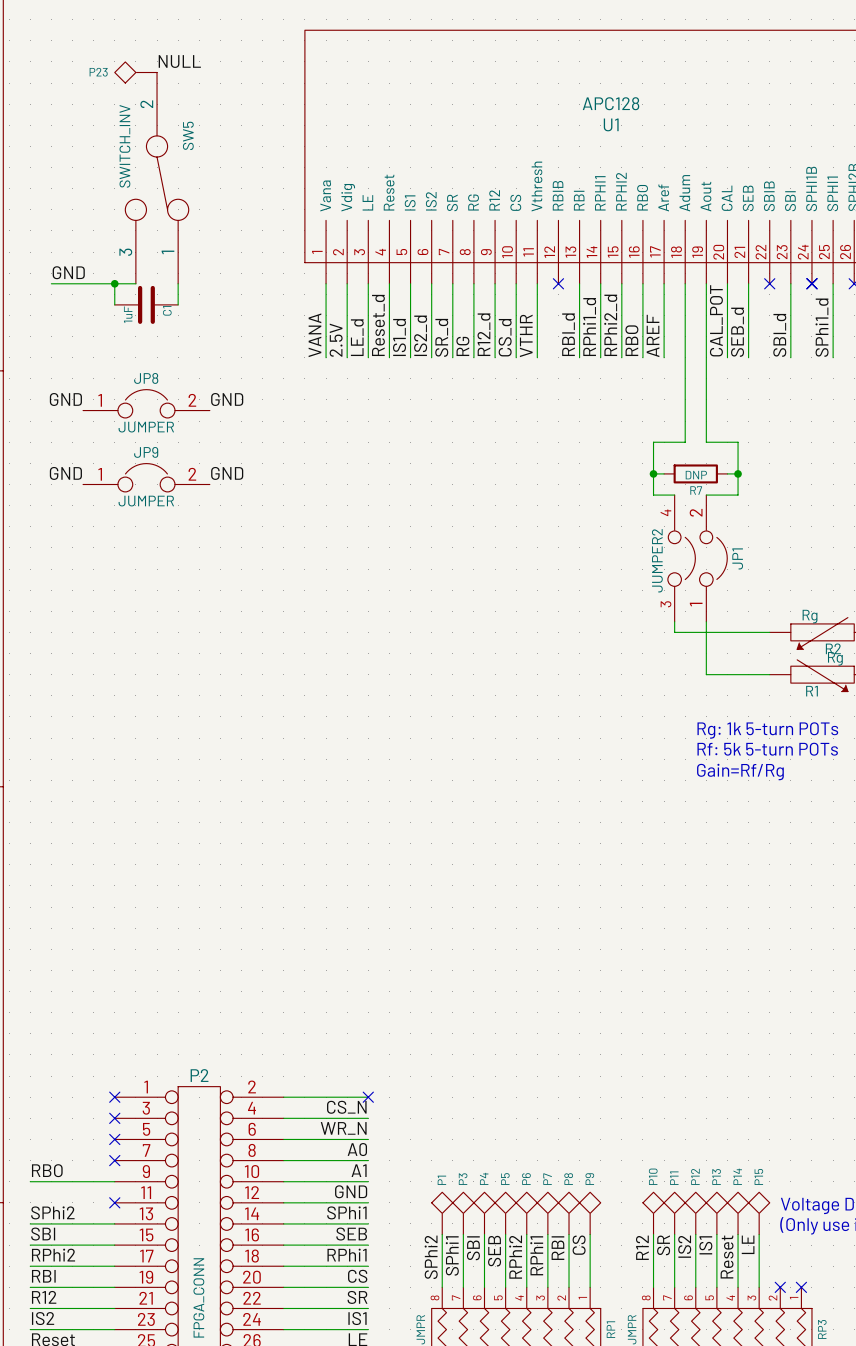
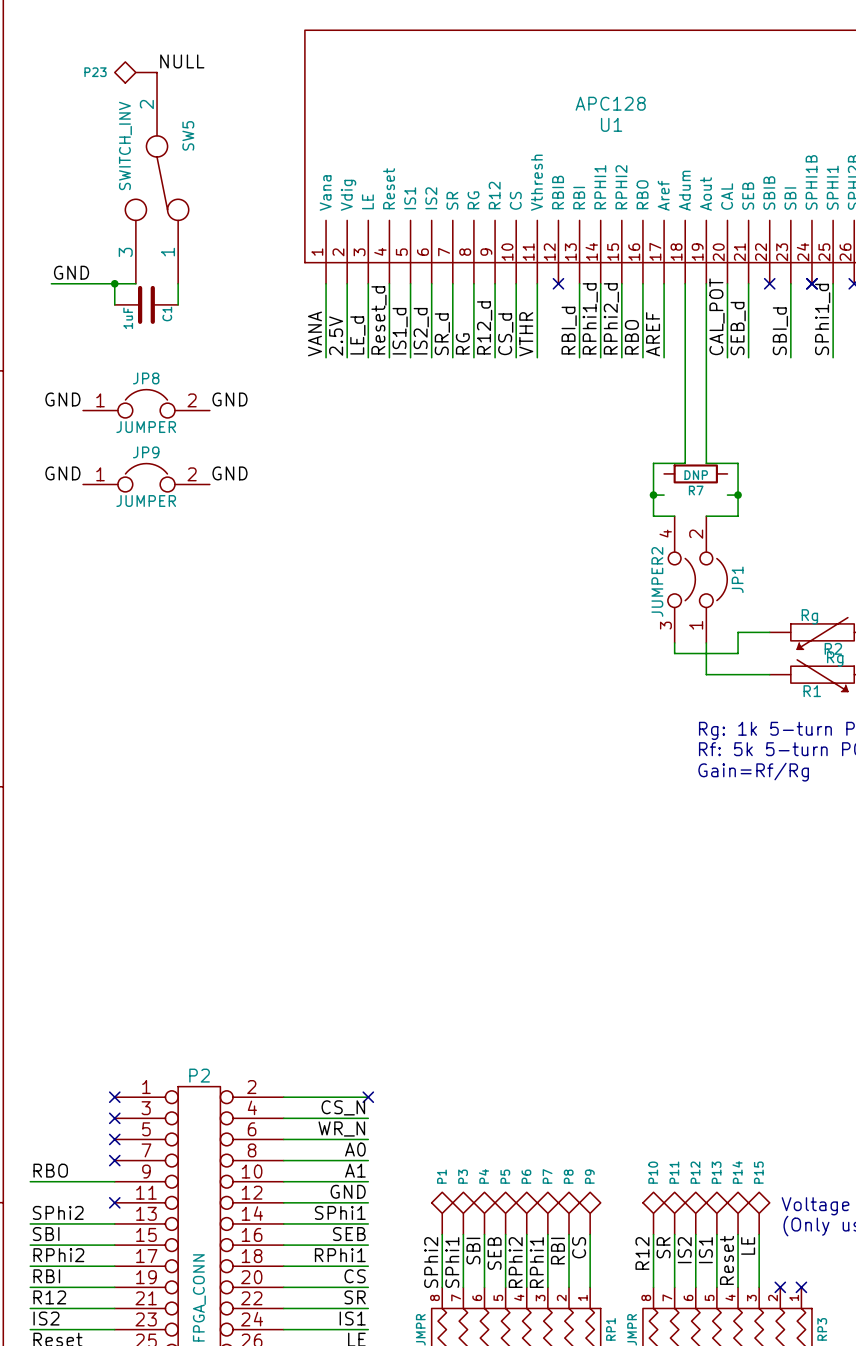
wire: (685, 442) (653, 442) (653, 463) -> (685, 442) (685, 463) (653, 463)
wire: (706, 442) (738, 442) (738, 463) -> (706, 442) (706, 463) (738, 463)
wire: (653, 473) (664, 473) -> none
junction position: (653, 473) -> (653, 495)
wire: (727, 473) (738, 473) -> none
junction position: (738, 473) -> (738, 495)
wire: none -> (653, 495) (653, 516) (674, 516)
wire: (664, 495) (674, 495) -> none
wire: (706, 495) (727, 495) -> none
wire: none -> (738, 495) (738, 516) (706, 516)
JP1 position: (697, 558) -> (697, 579)
wire: (674, 621) (674, 632) (738, 632) -> (674, 642) (674, 653) (738, 653) (738, 632)

